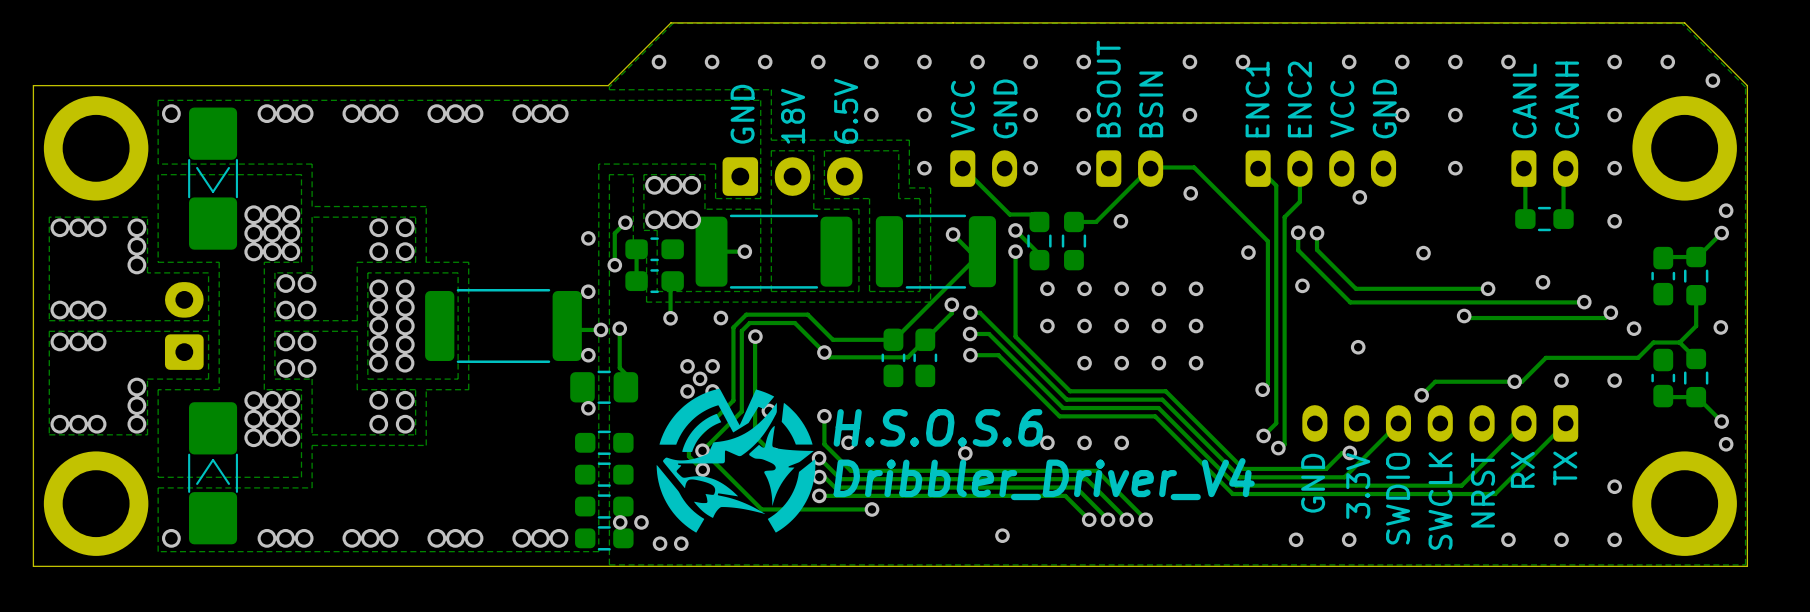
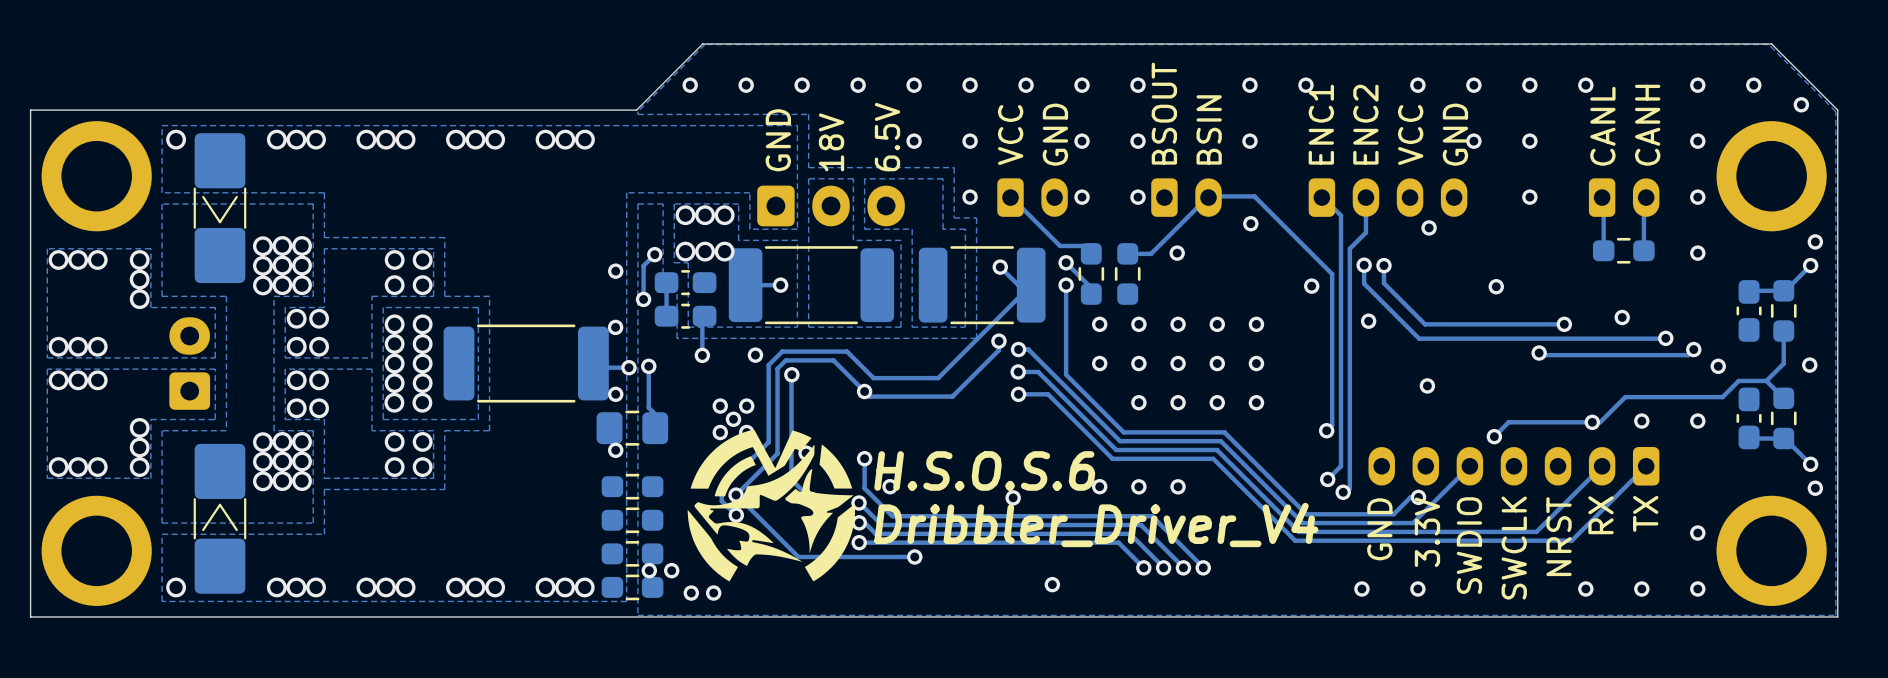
part: (893, 357) -> none
part: (925, 357) -> none

